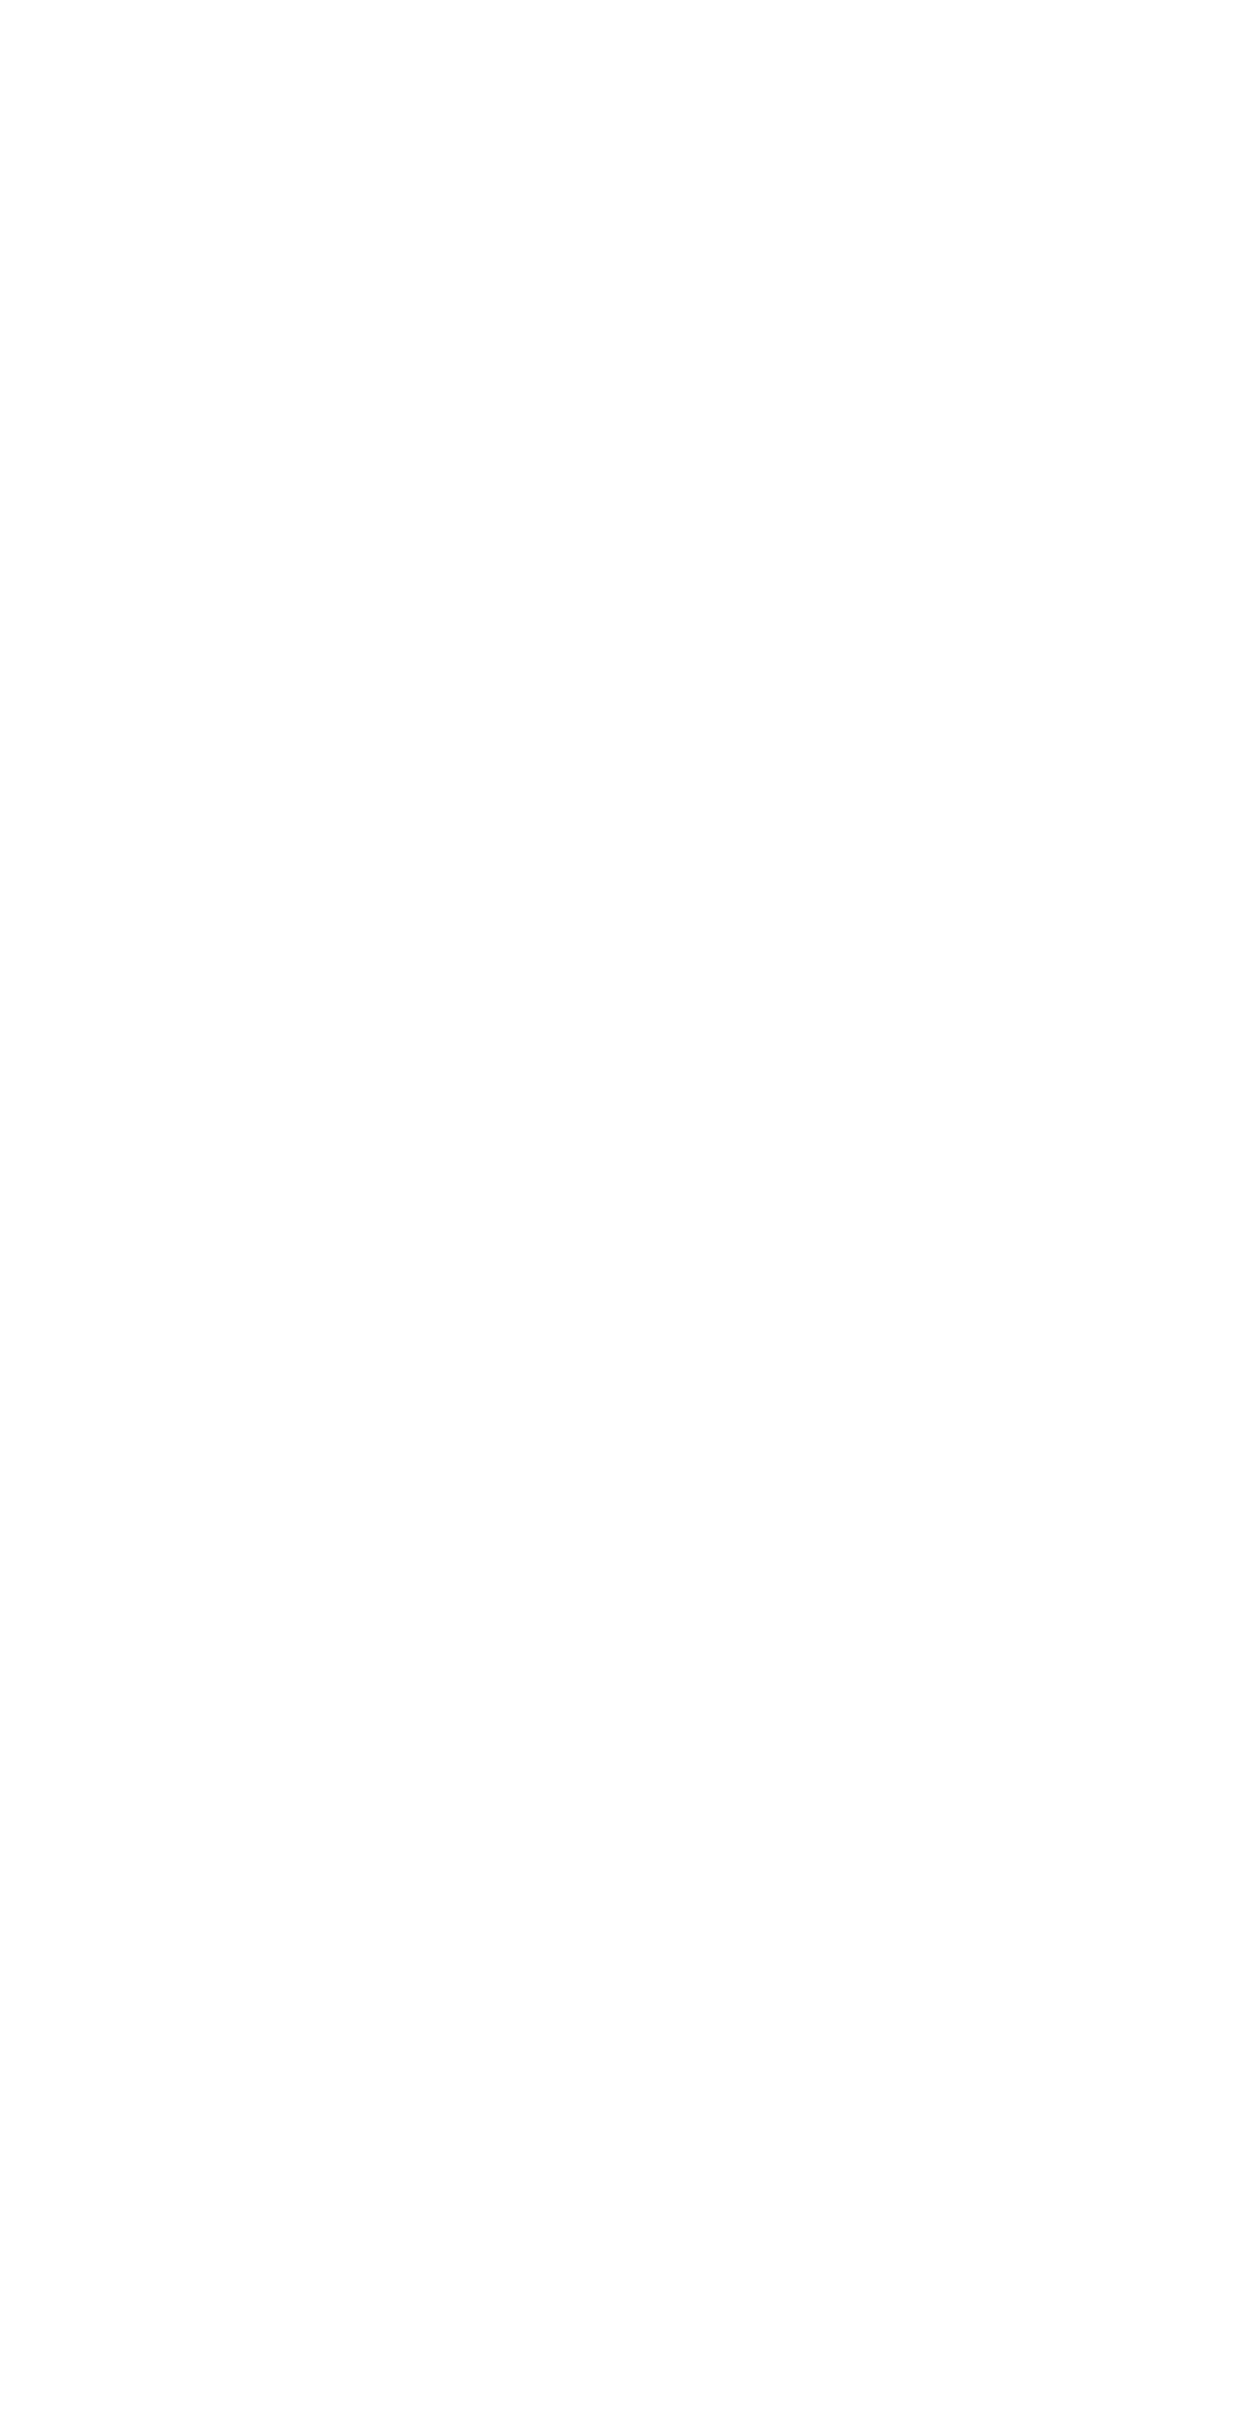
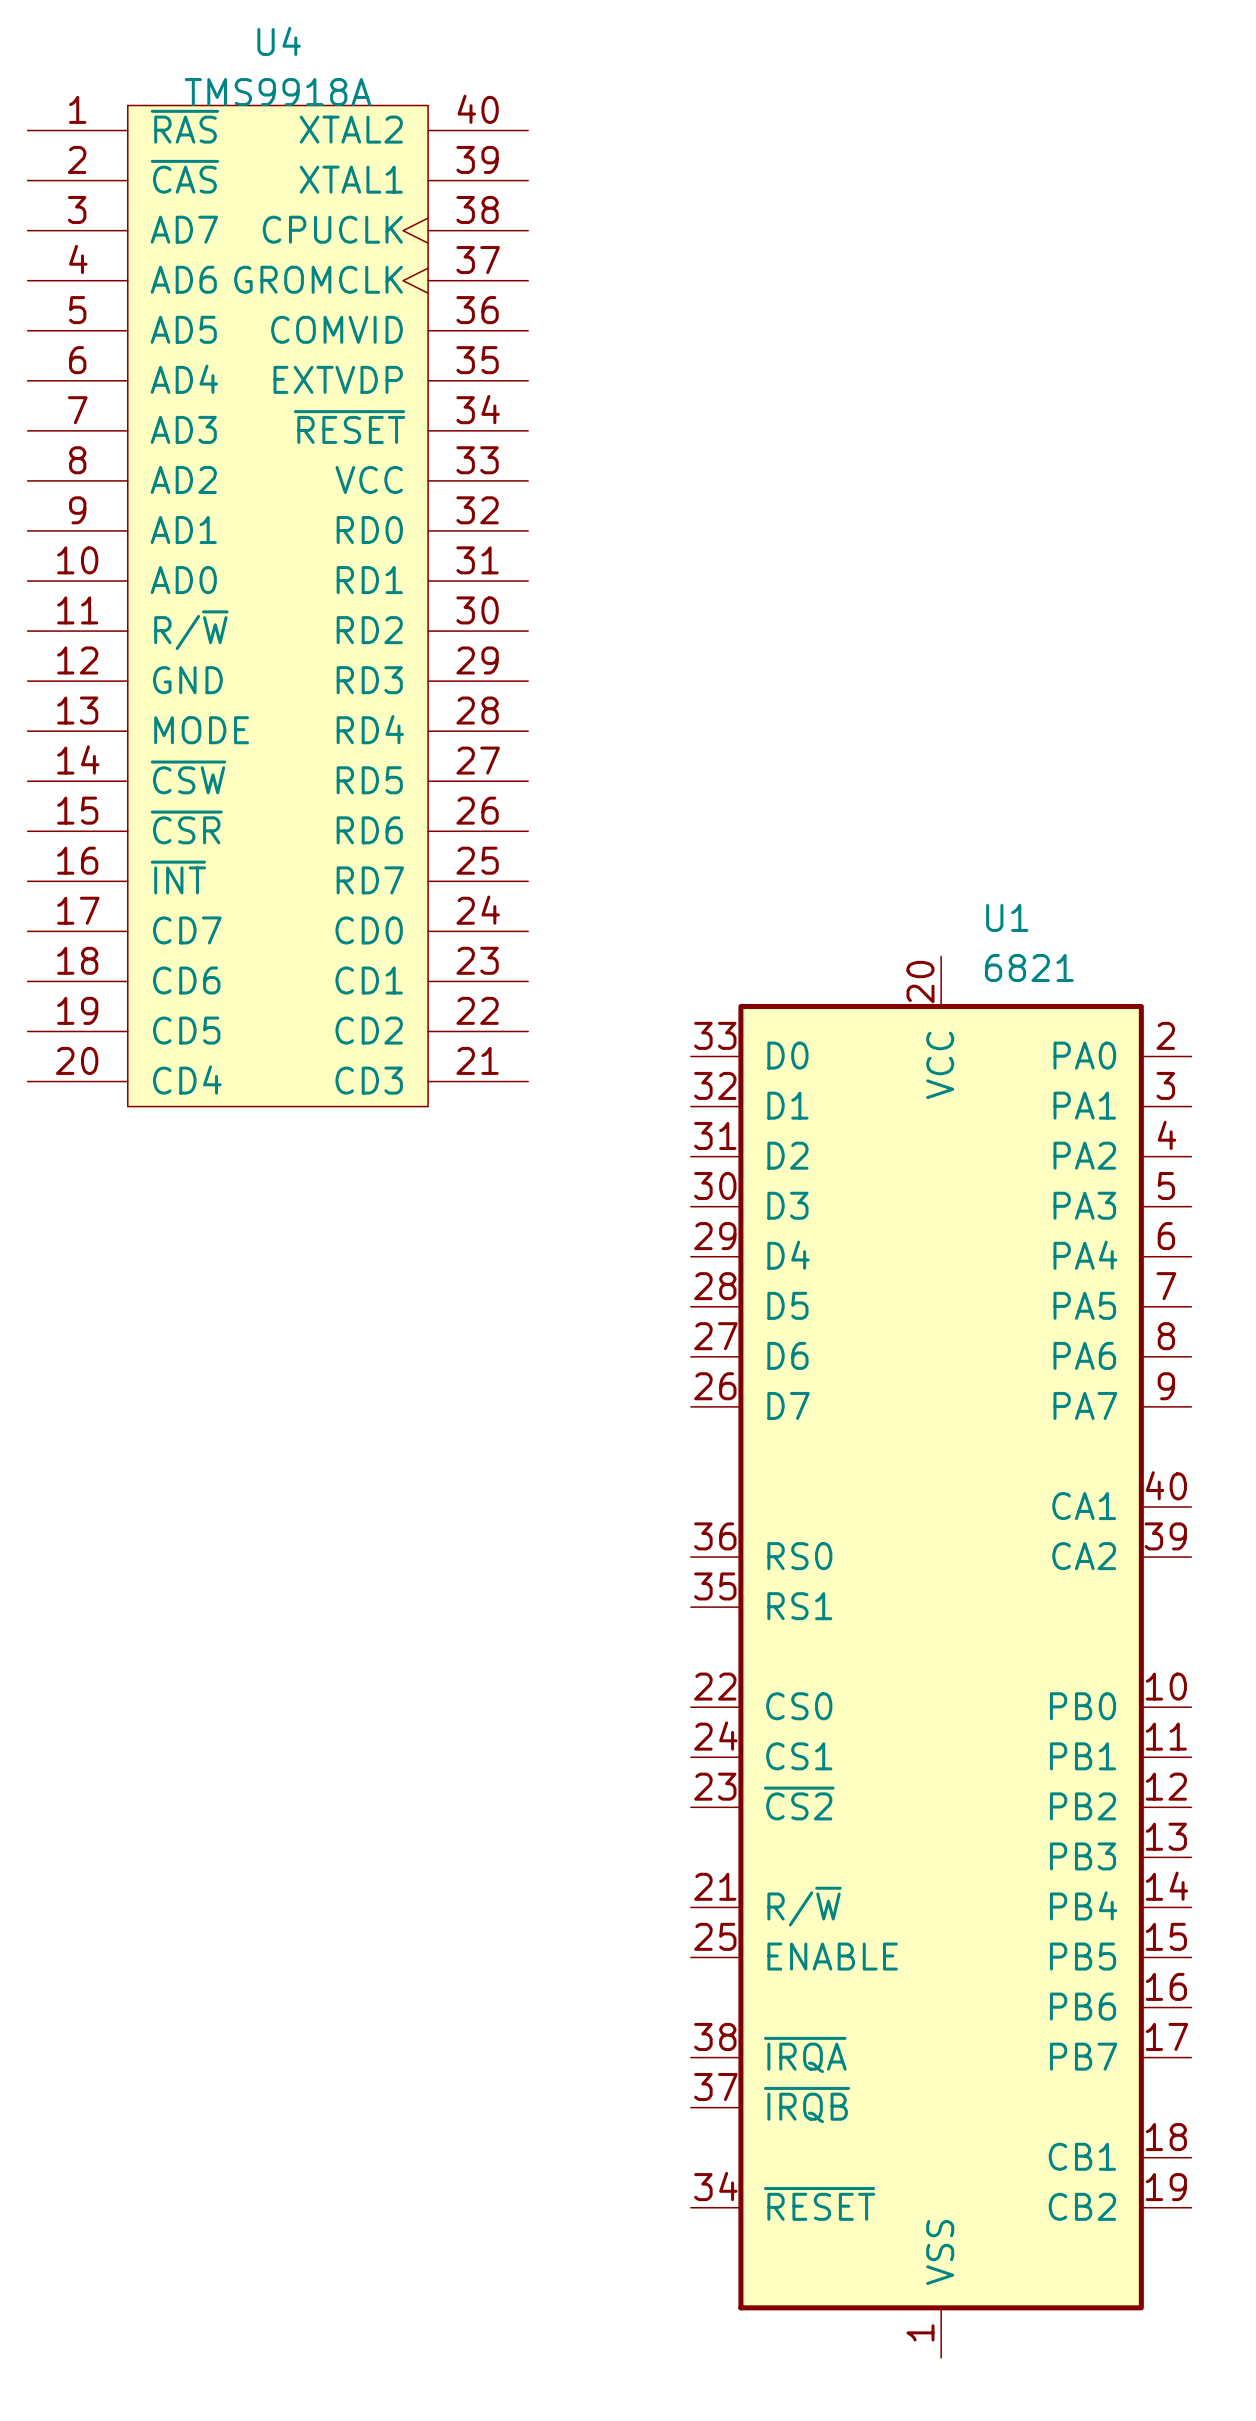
U4: none -> TMS9918A (277, 606)
U1: none -> 6821 (941, 1657)

